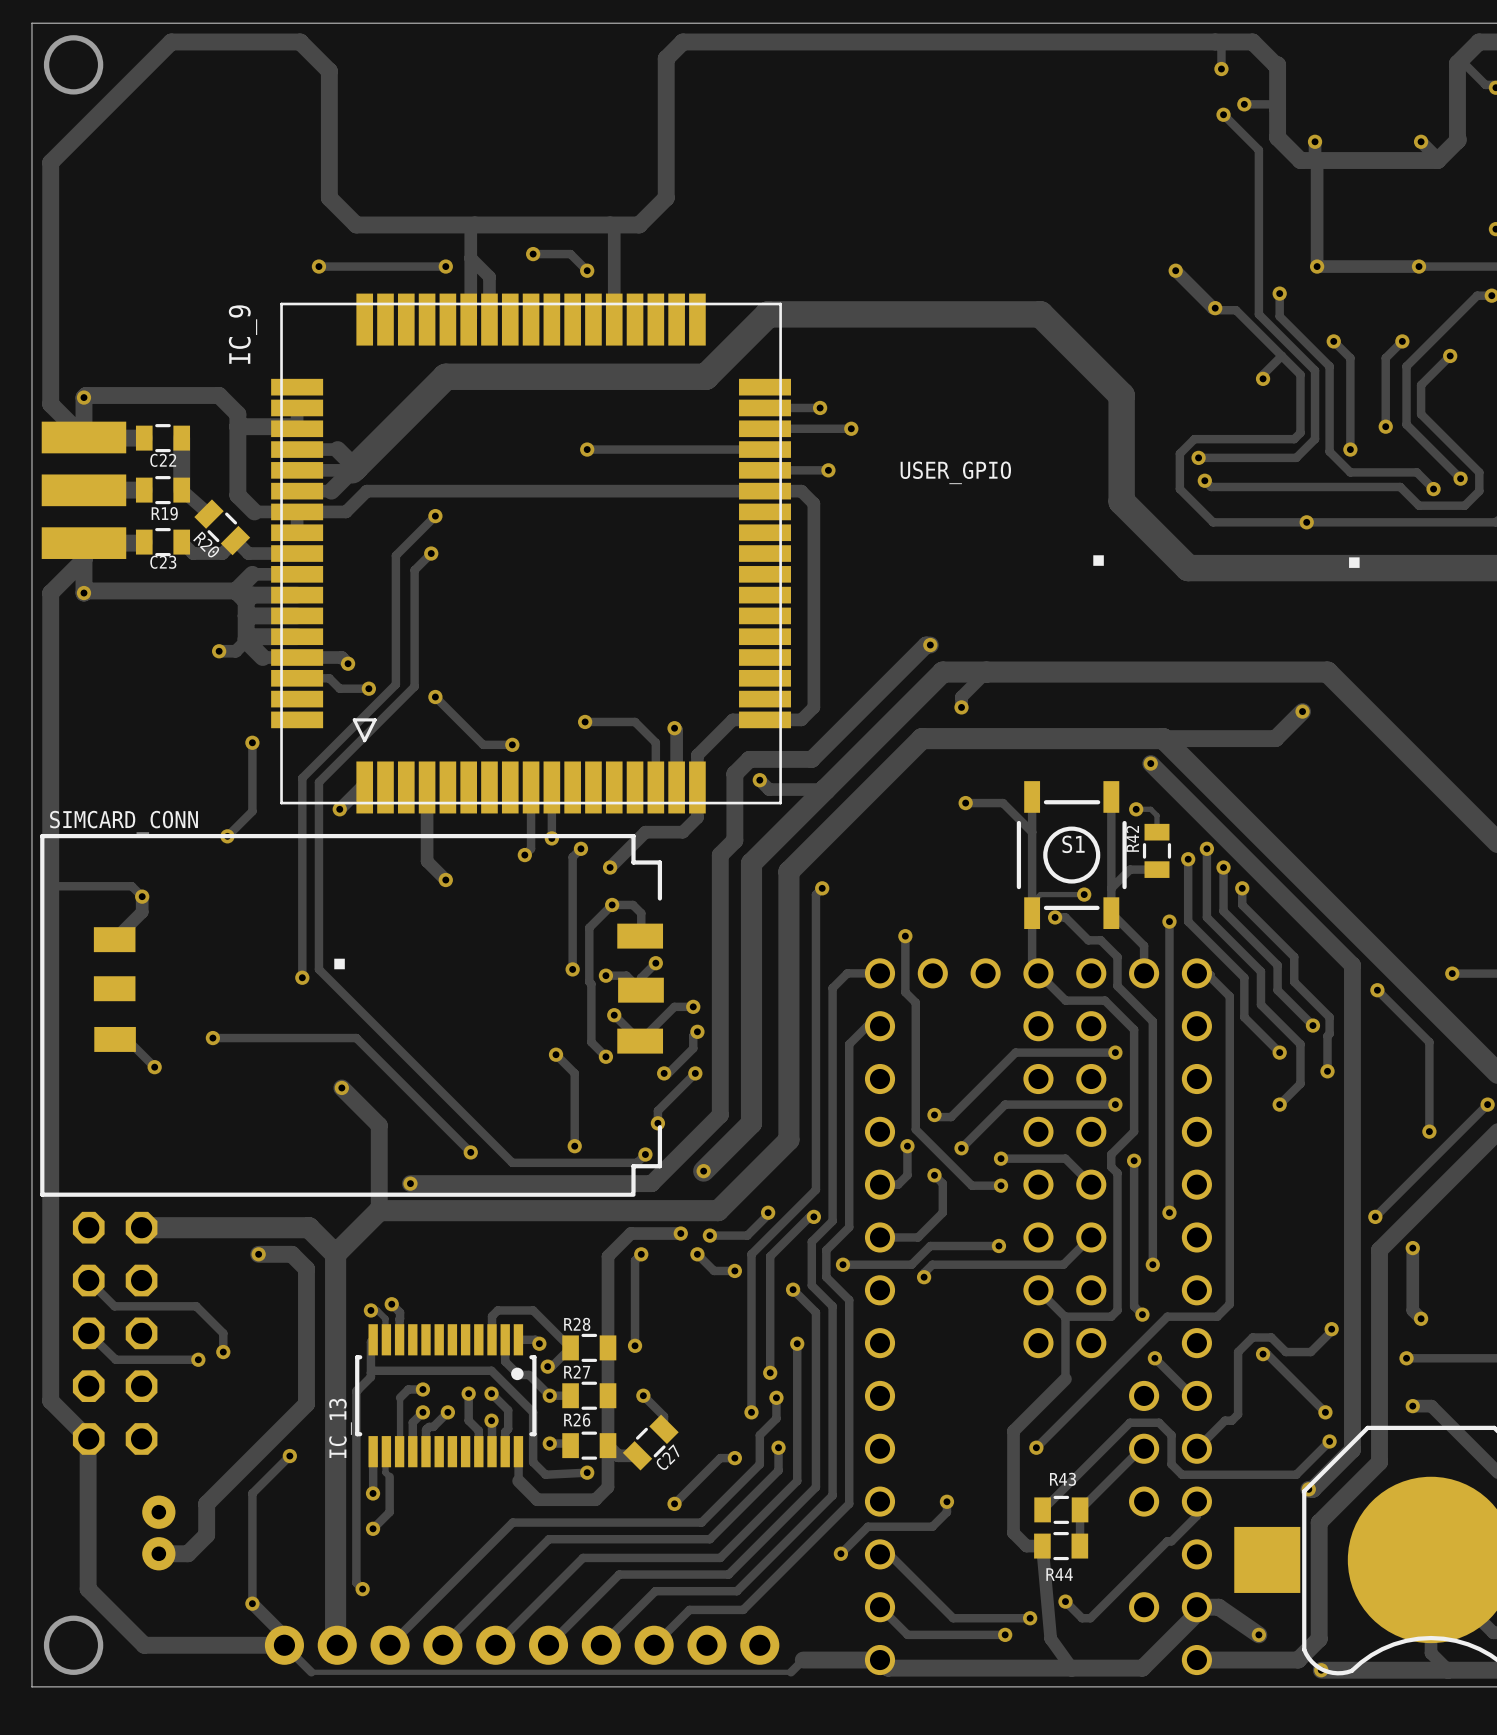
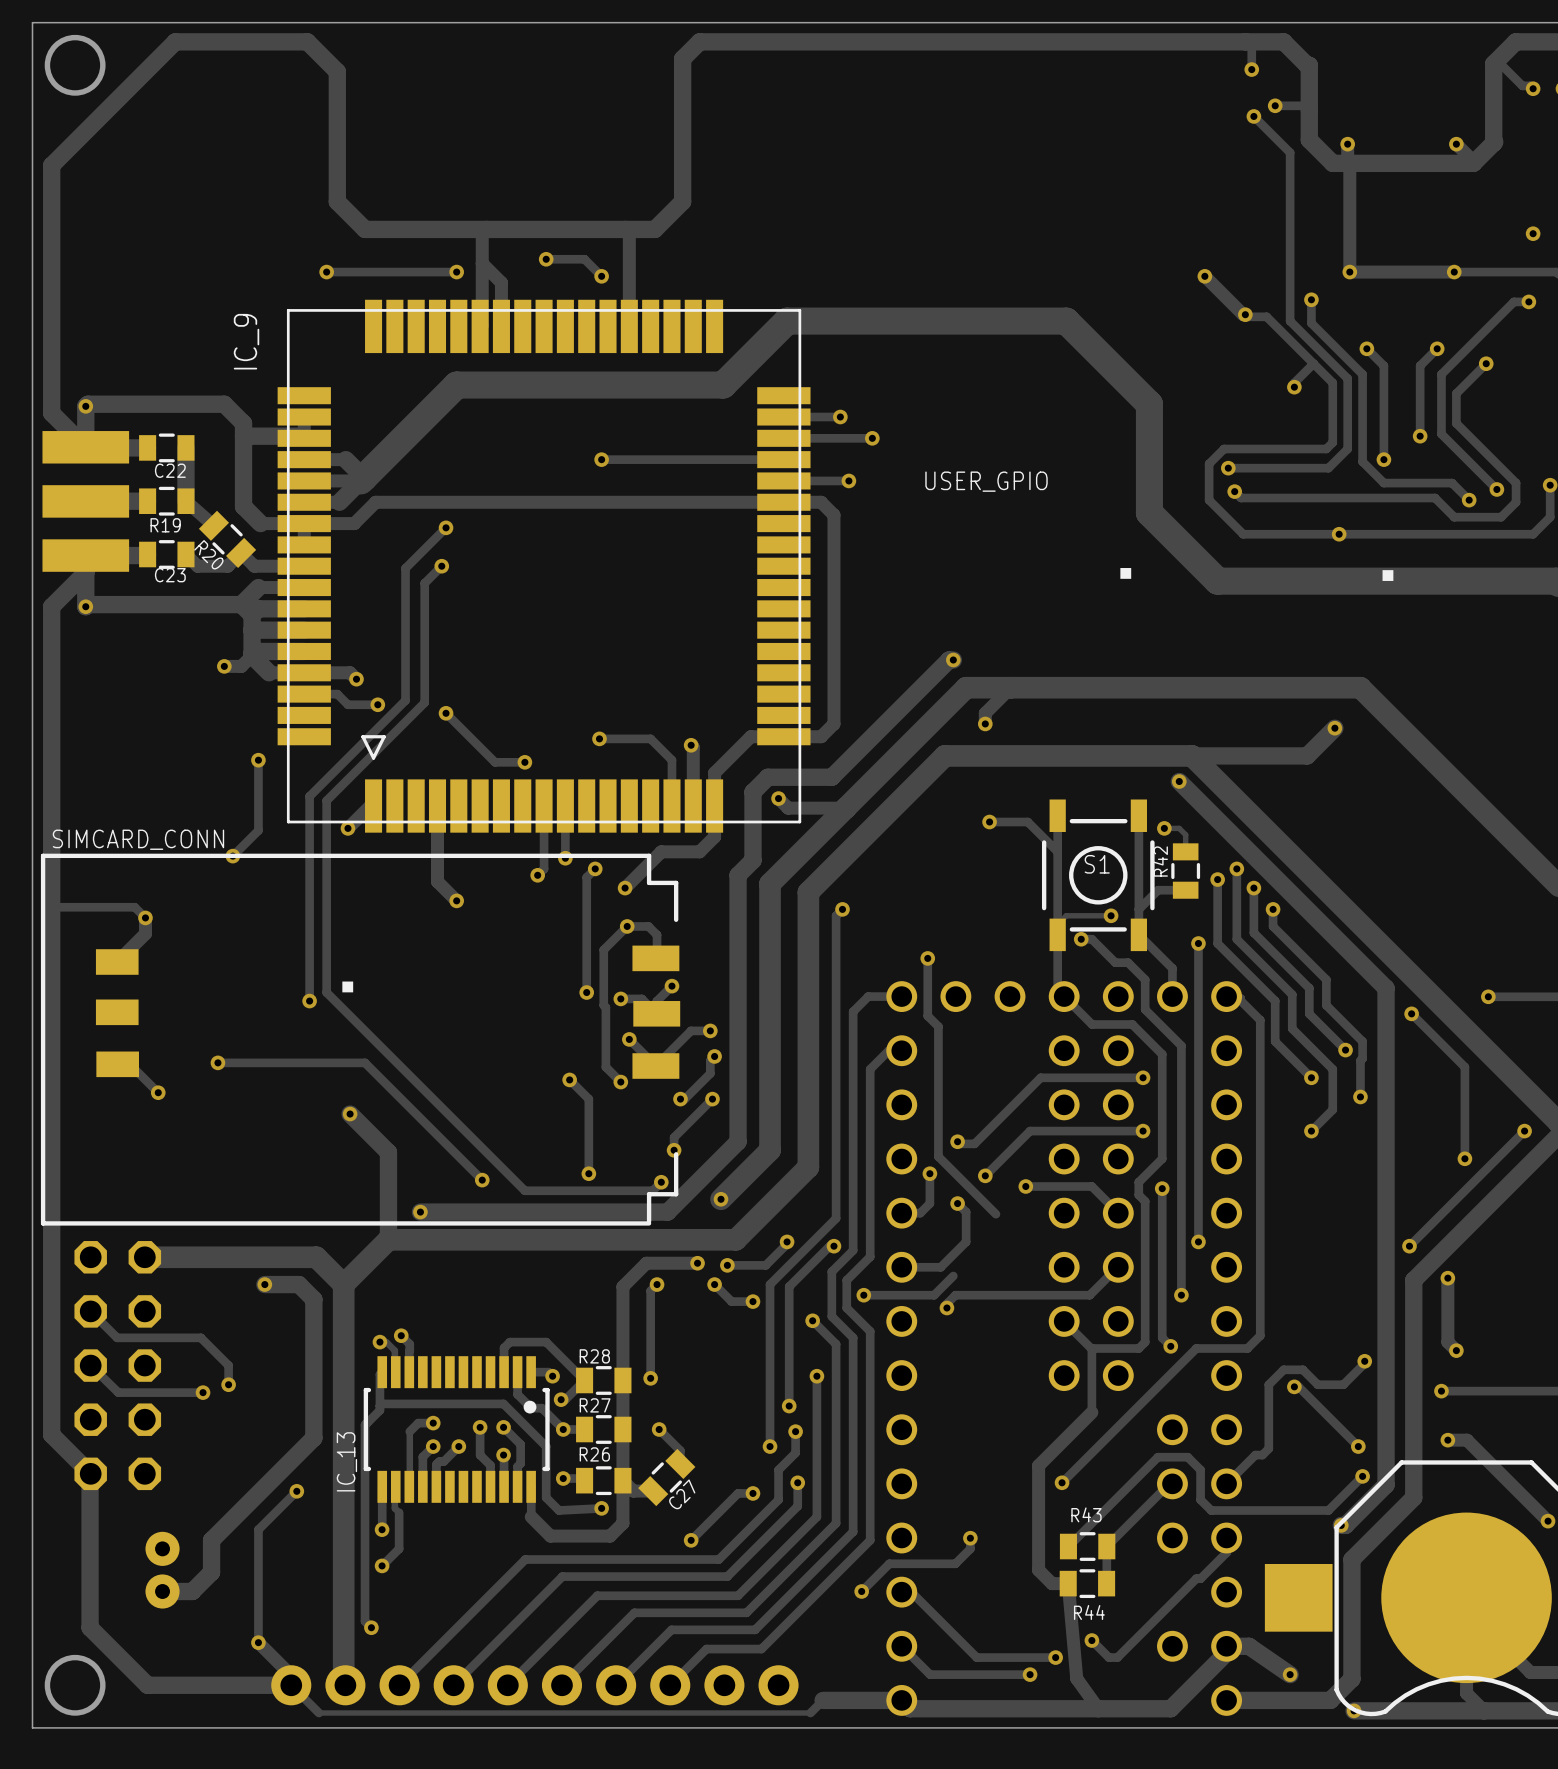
track: (1001, 1185) (971, 1185) -> none
via: (1001, 1185) -> none
track: (998, 1246) (930, 1246) -> none
via: (998, 1246) -> none
track: (1154, 1358) (1192, 1395) (1196, 1395) -> none
via: (1154, 1358) -> none

